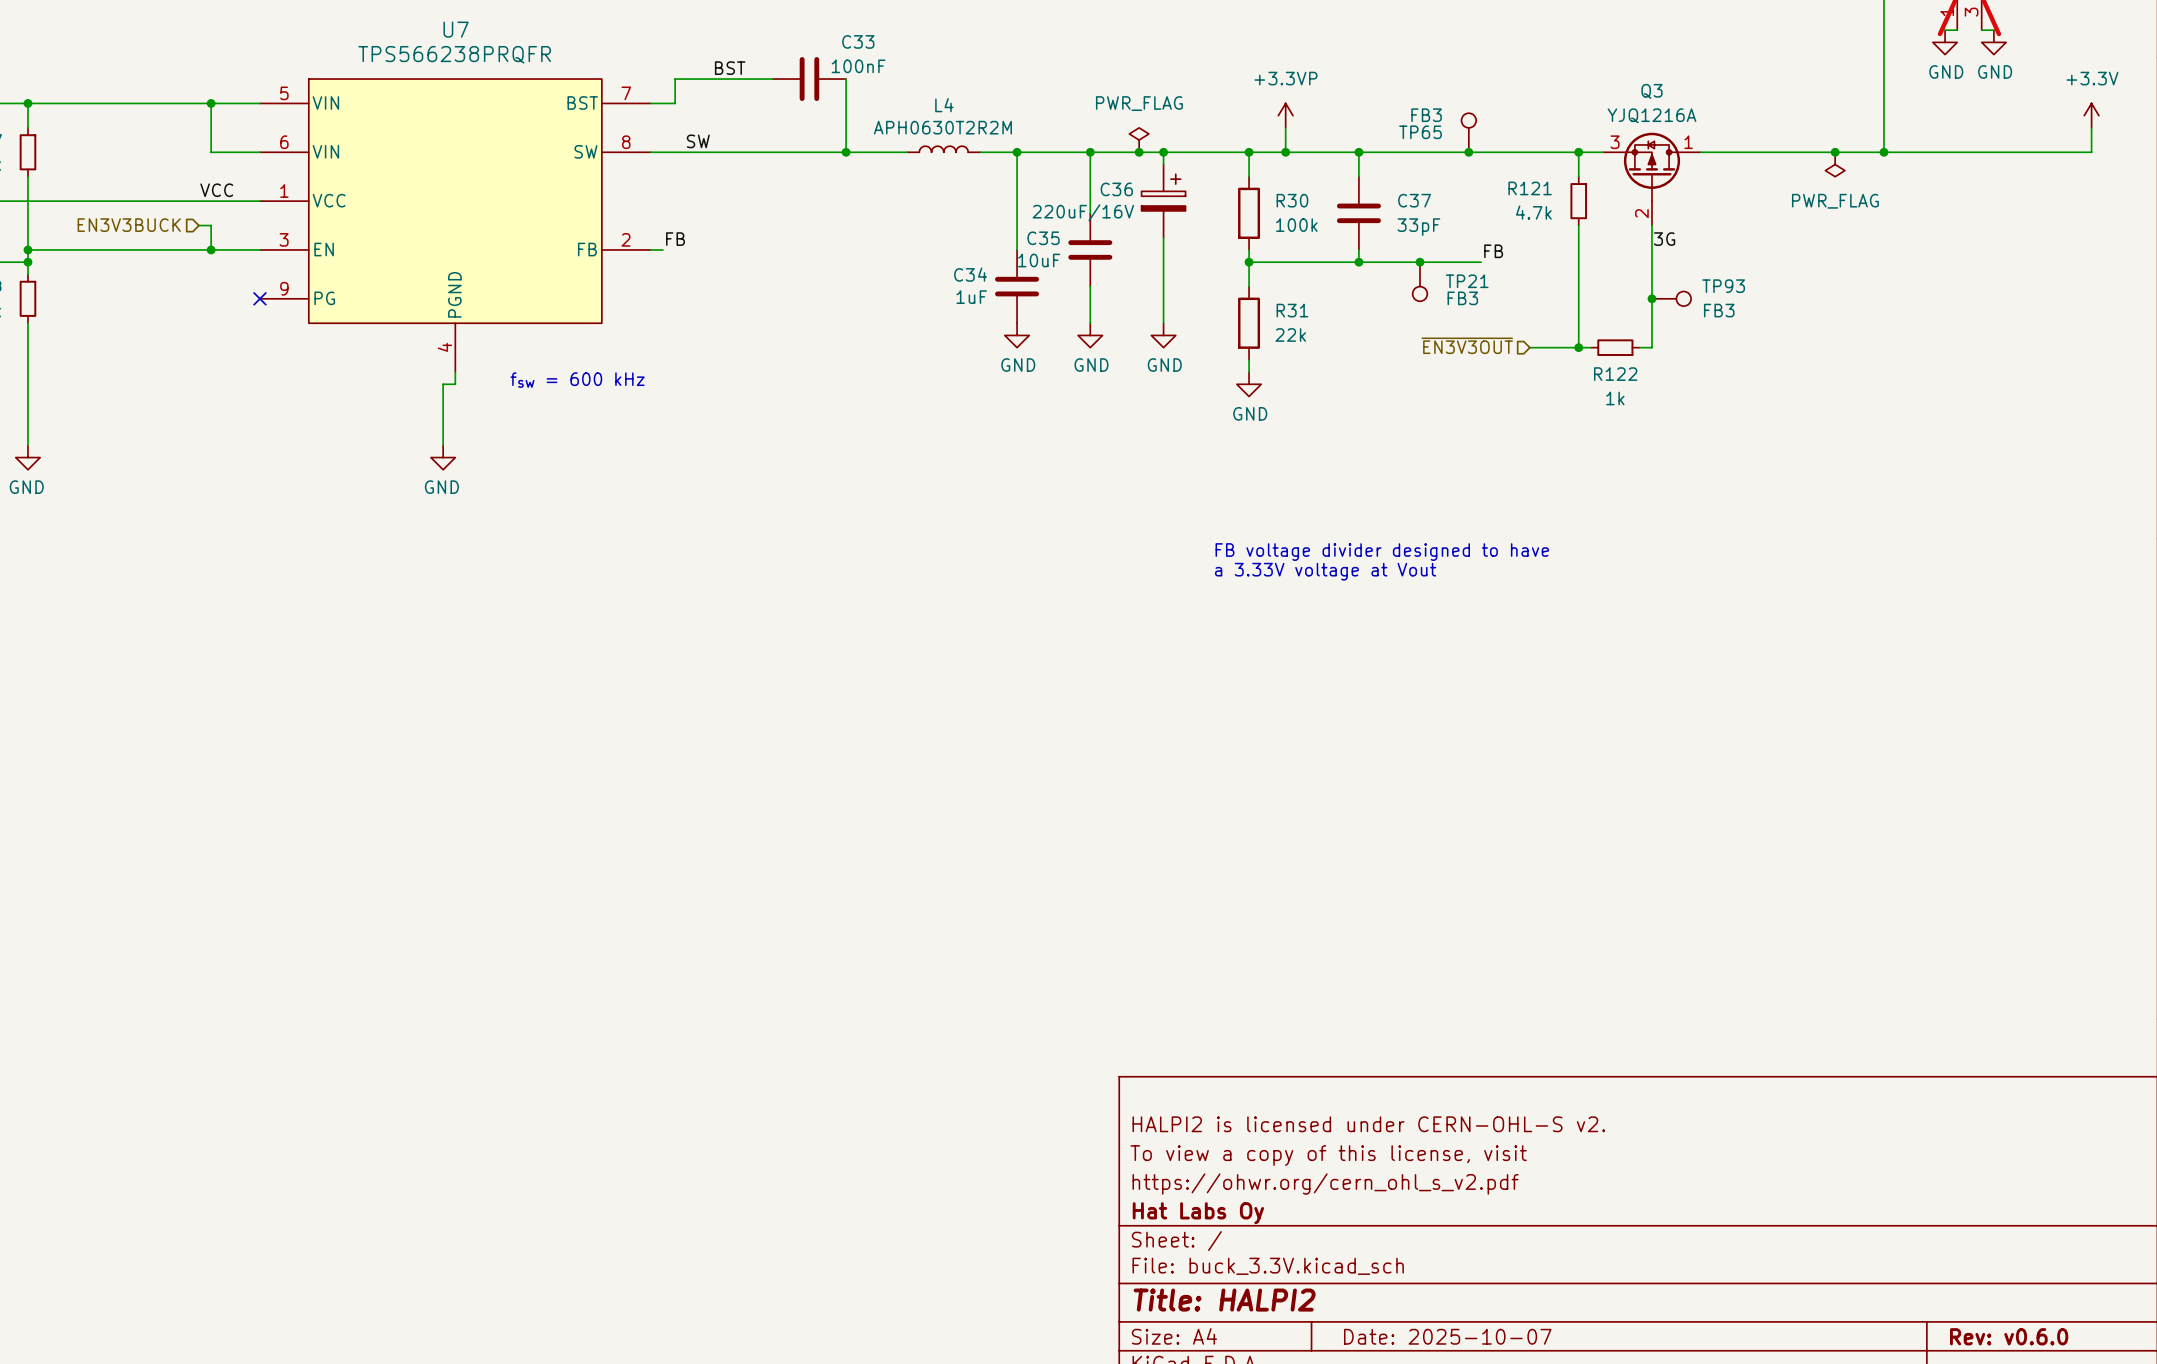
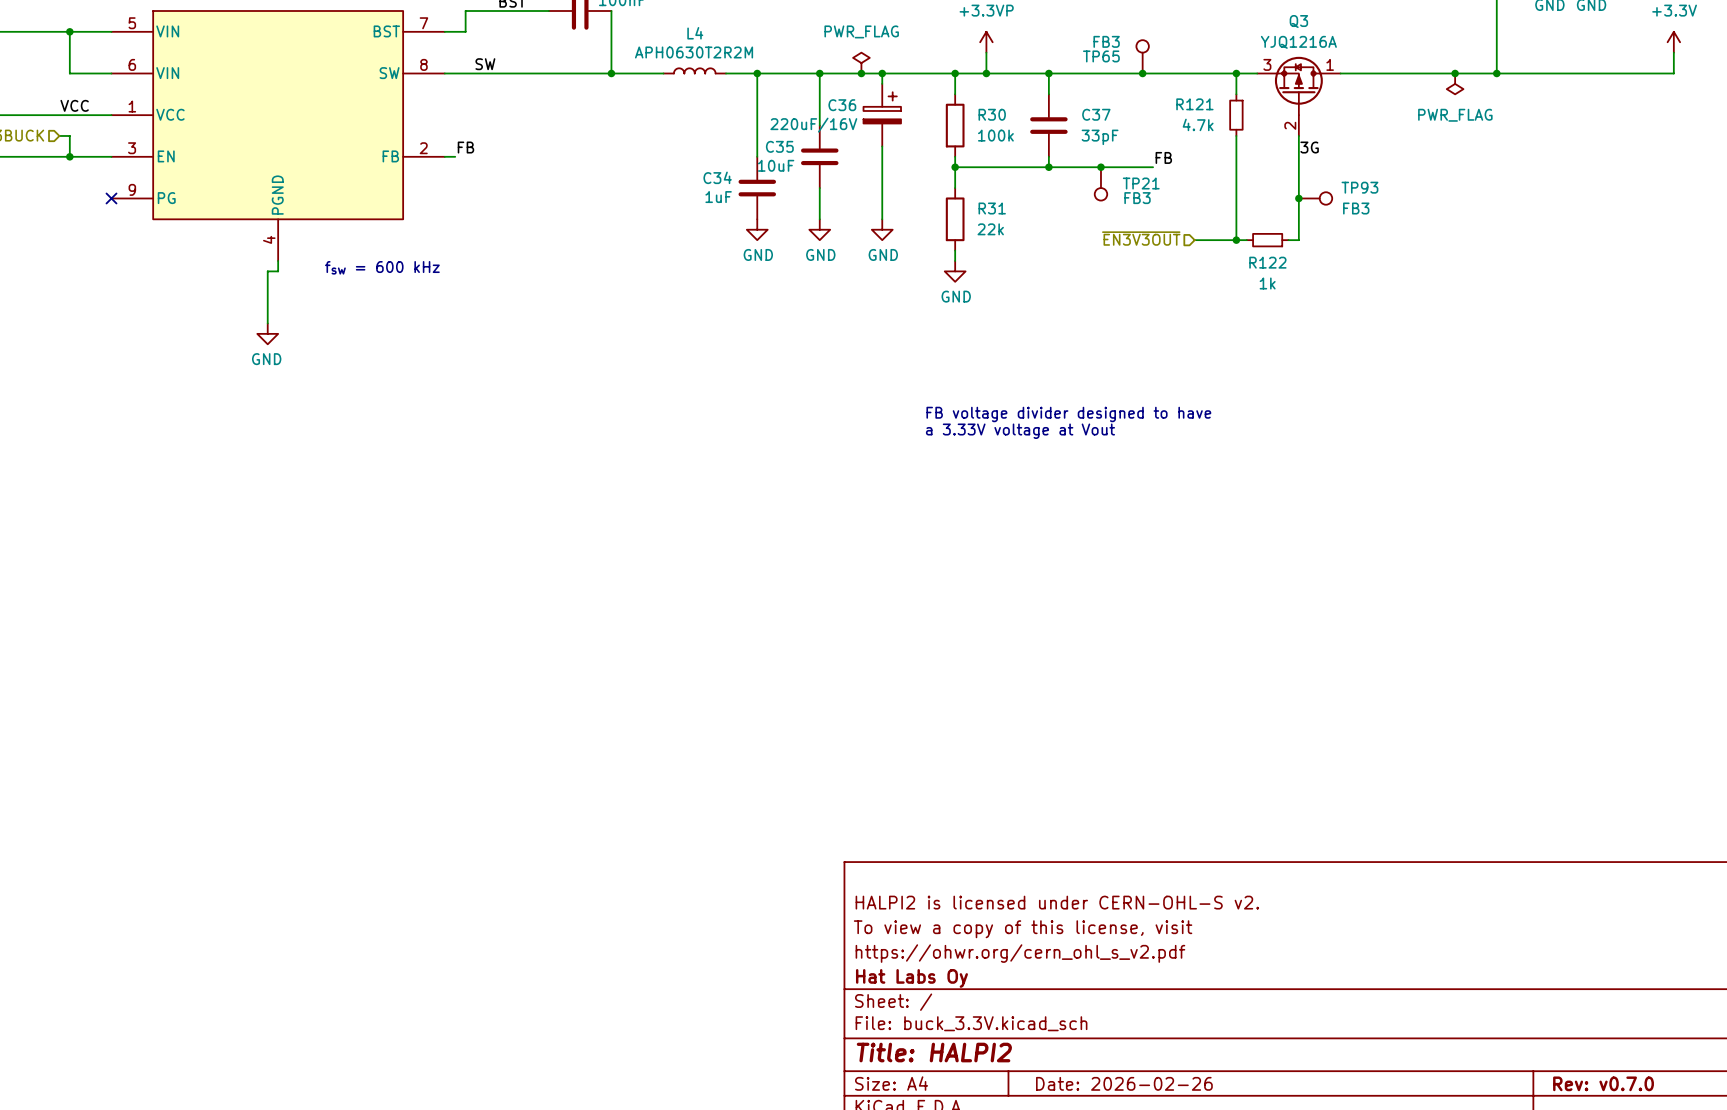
title block: Date: 2025-10-07 (1447, 1336) -> Date: 2026-02-26 (1124, 1083)
title block: Rev: v0.6.0 (2009, 1336) -> Rev: v0.7.0 (1603, 1083)

